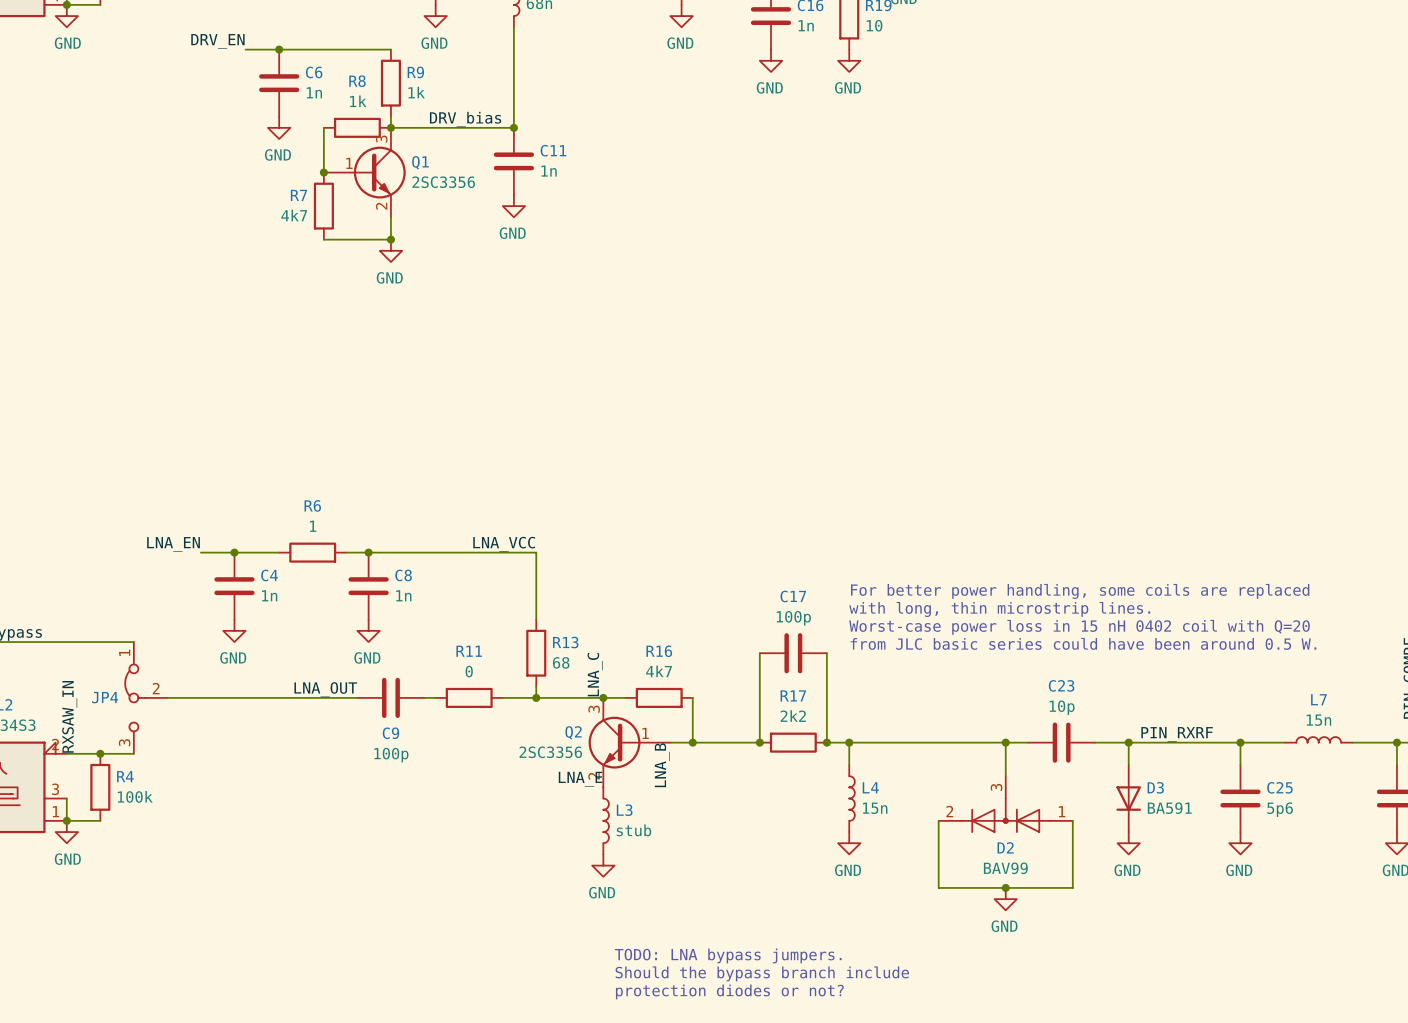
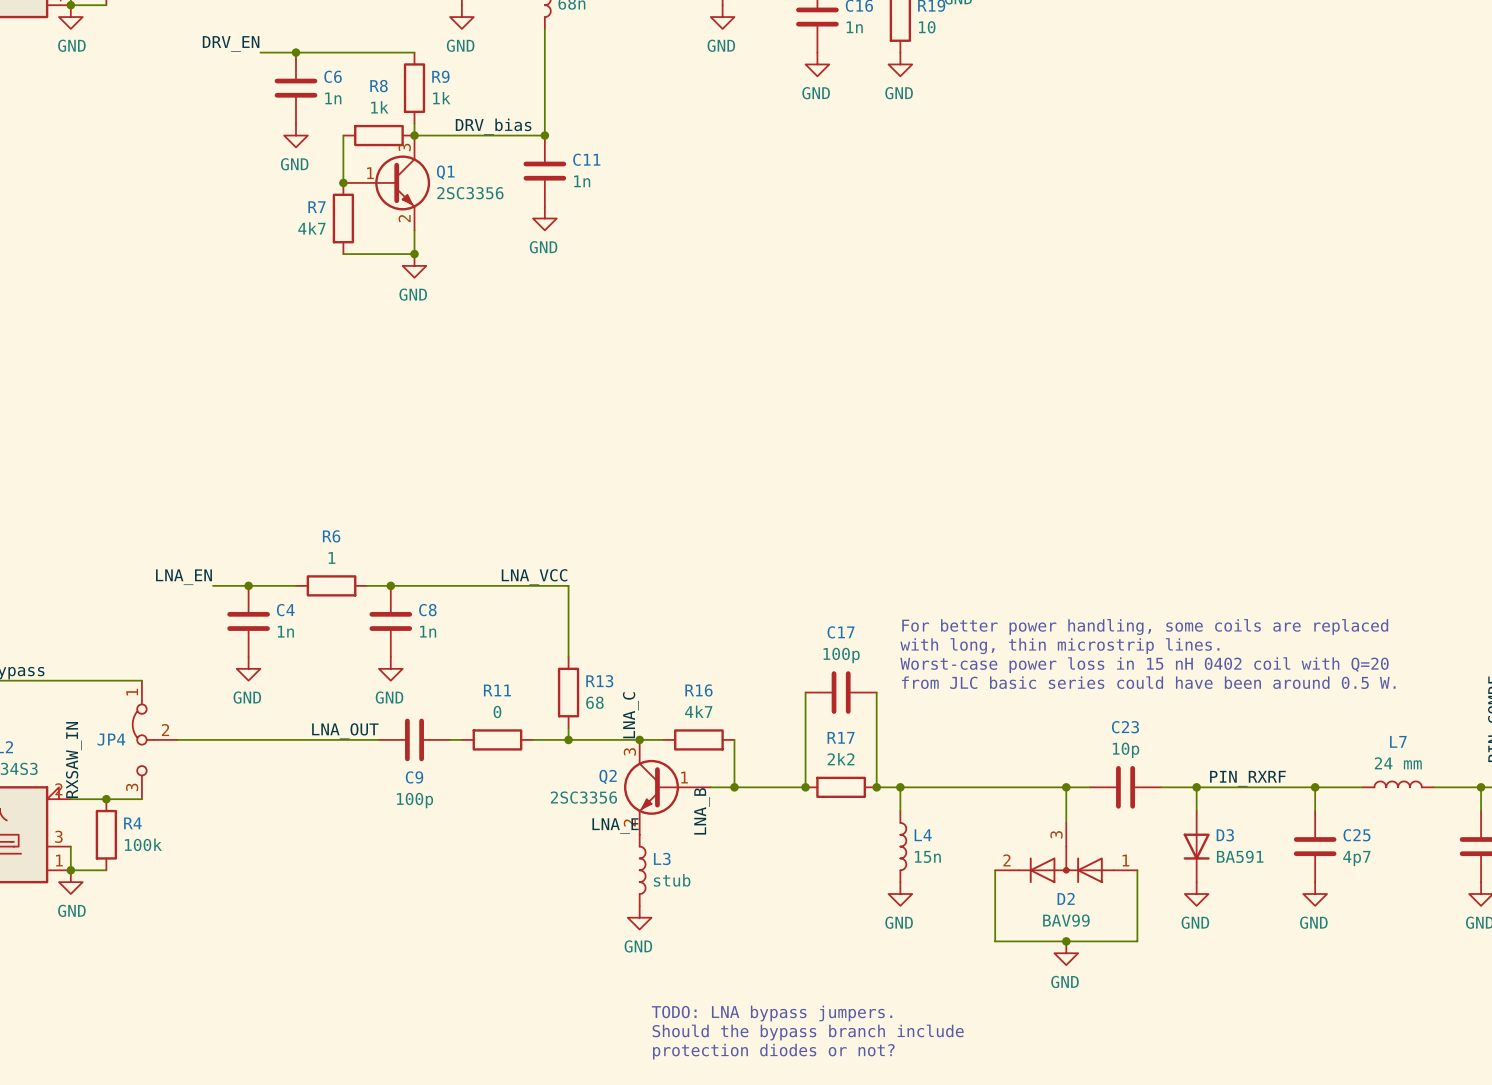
L7 value: 15n (1318, 720) -> 24 mm (1398, 763)
C25 value: 5p6 (1280, 809) -> 4p7 (1356, 858)

